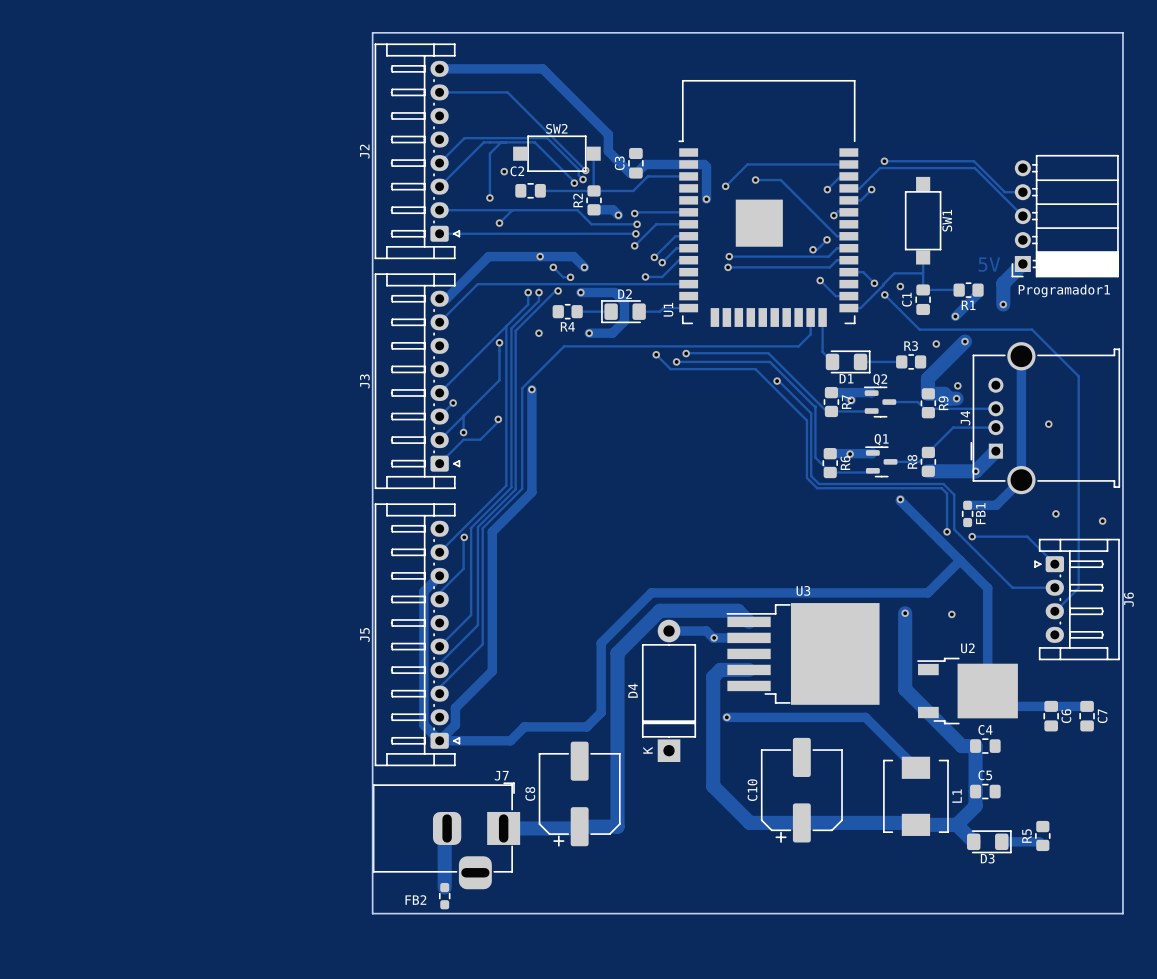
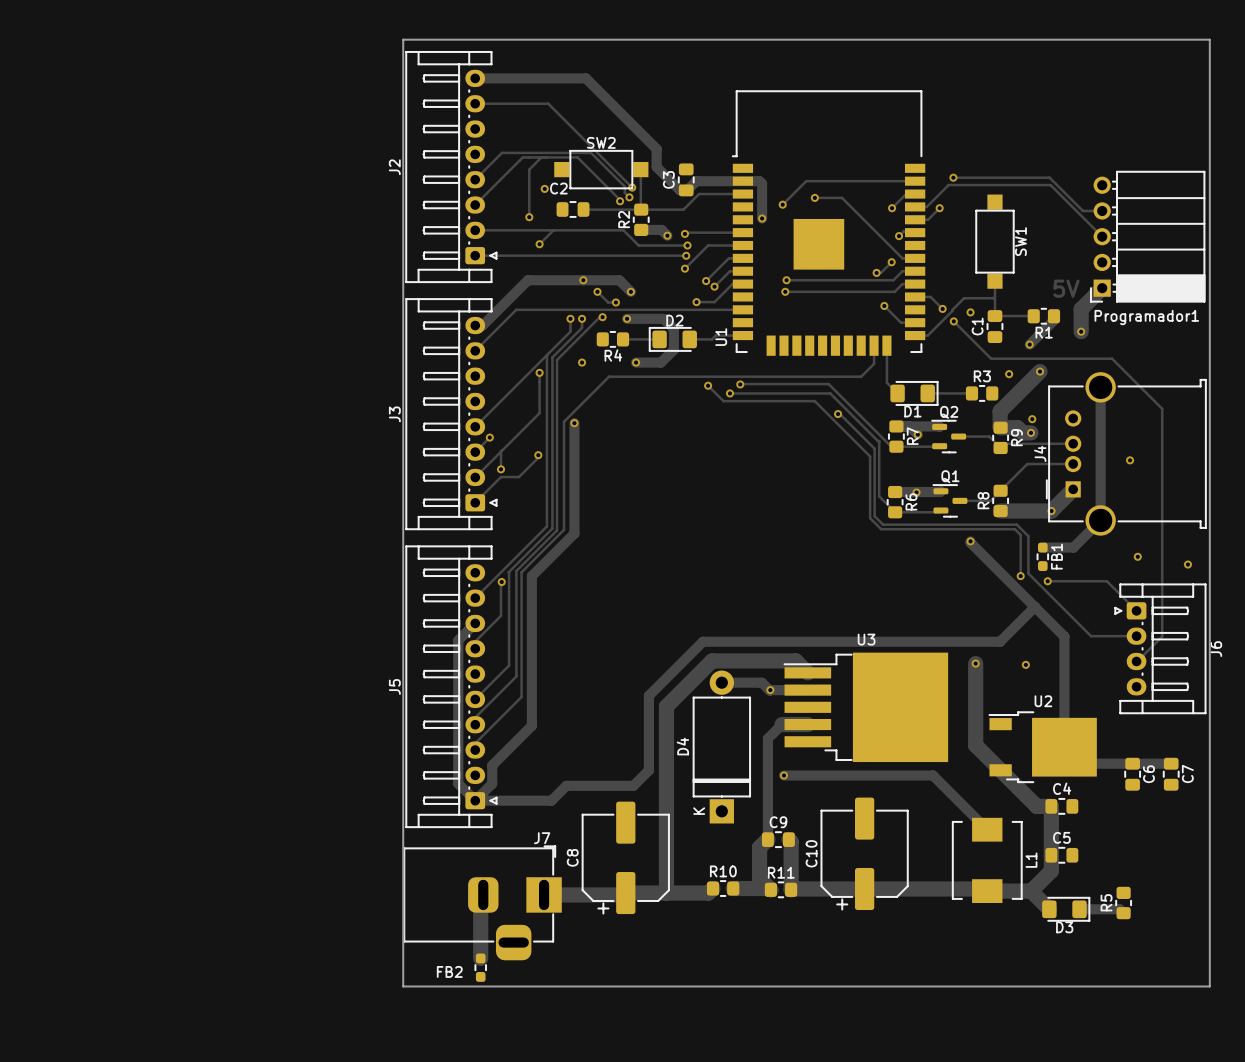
track: (725, 669) (720, 669) (713, 677) (713, 786) (749, 822) -> (782, 724) (767, 738) (767, 839) (759, 847) (759, 878) (770, 889)
C9: none -> (778, 839)
track: none -> (788, 839) (791, 841) (791, 889) (808, 888)
track: none -> (712, 888) (708, 893) (666, 893)
R10: none -> (723, 888)
track: none -> (733, 888) (769, 888)
R11: none -> (781, 889)

